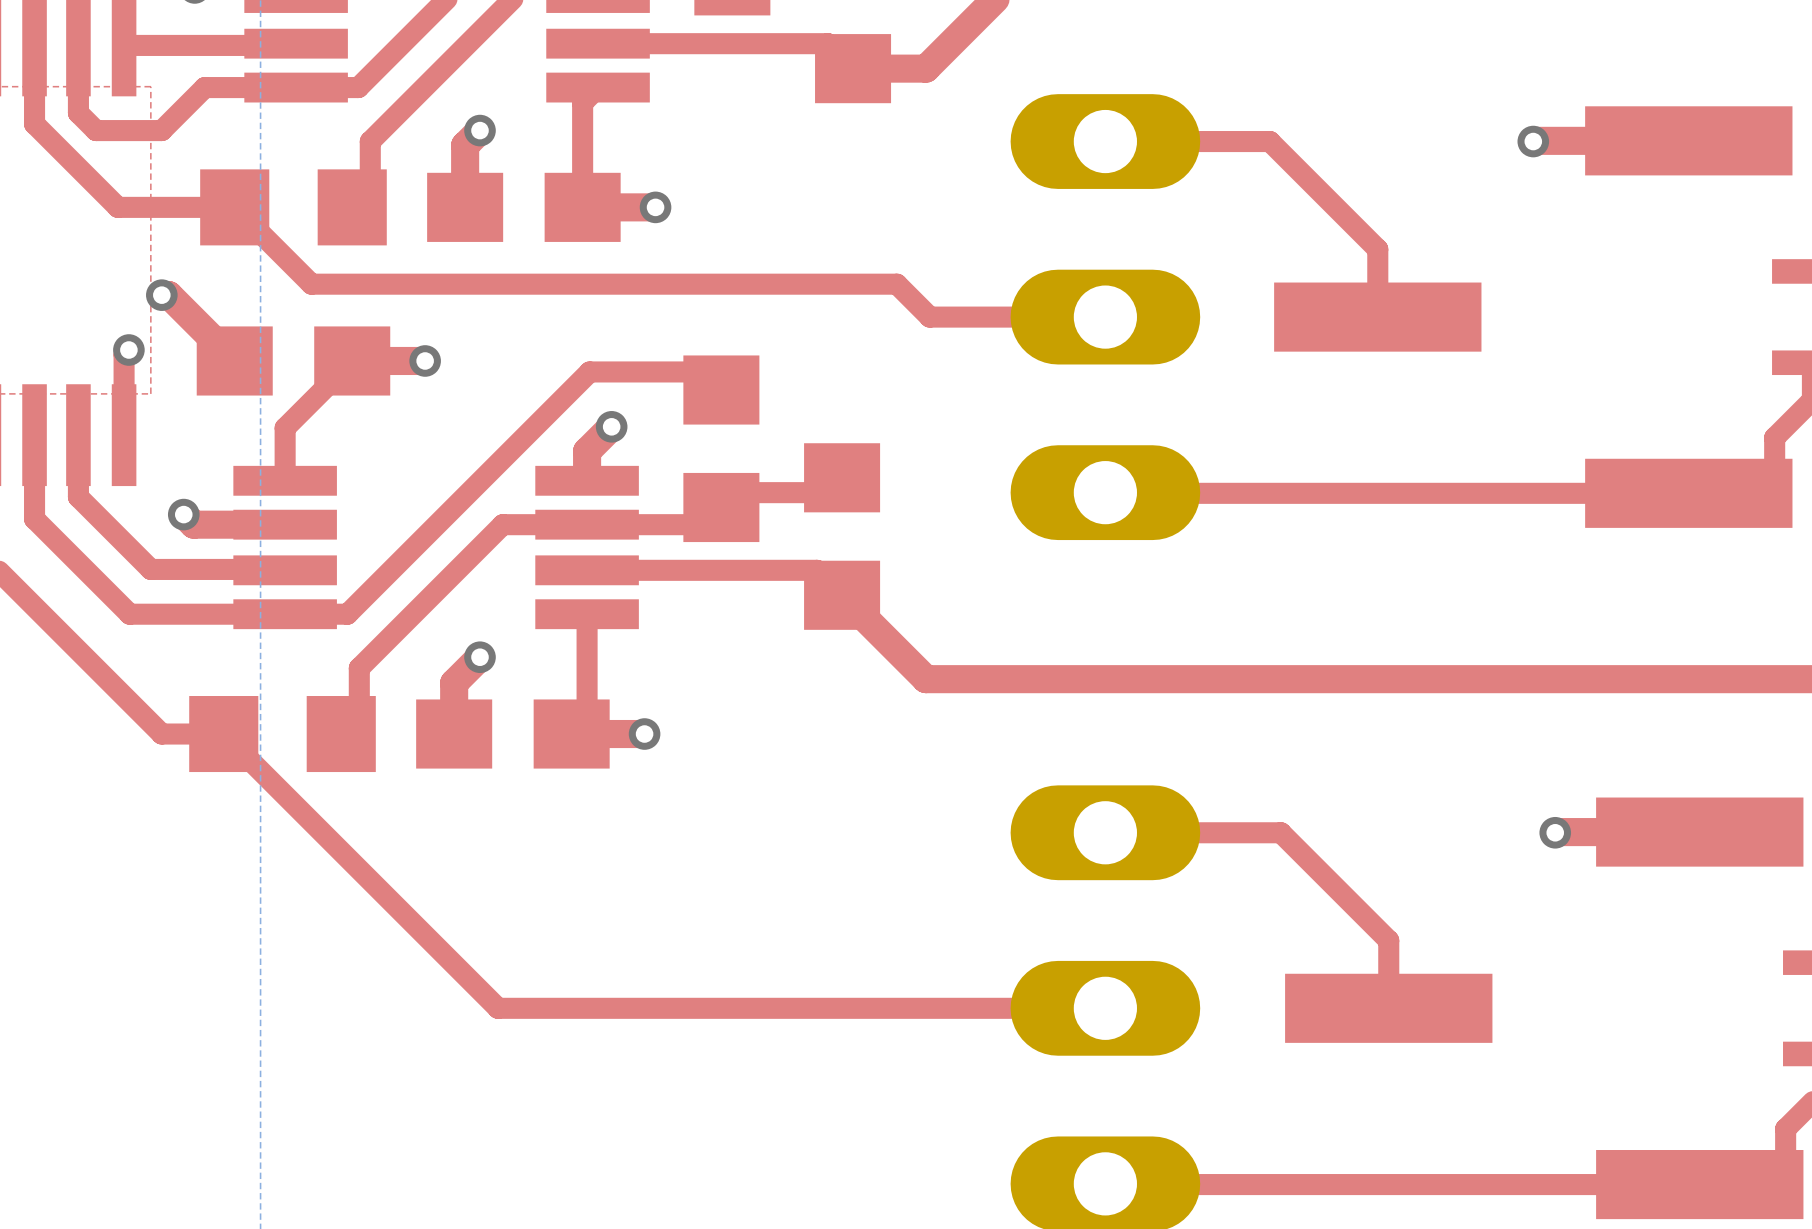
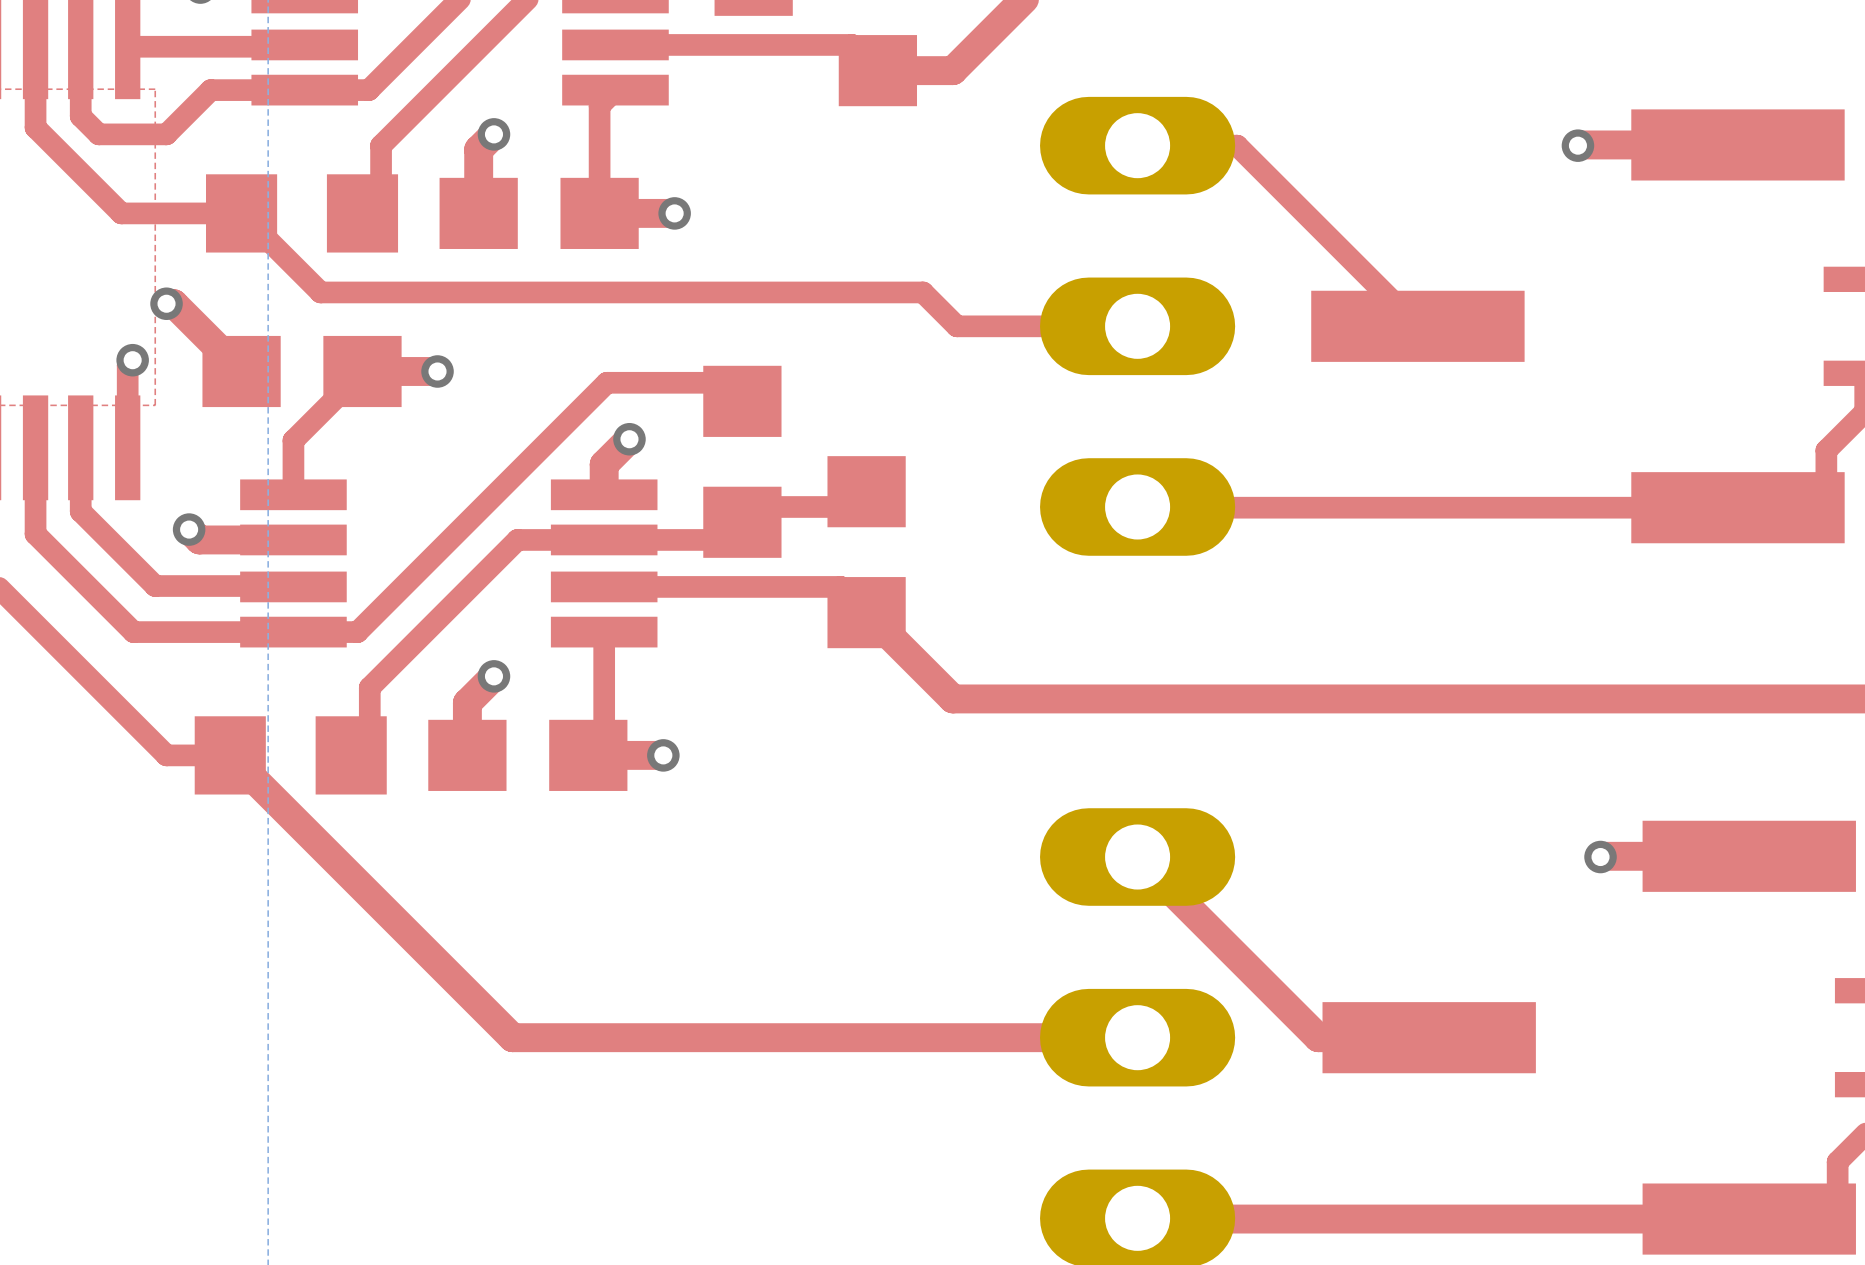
top track: (1202, 141) (1269, 141) (1377, 249) (1377, 317) -> (1237, 145) (1417, 326)
top track width: thin (223, 734) (498, 1008) (1105, 1008) -> thick (230, 755) (512, 1037) (1137, 1037)
top track: (1105, 832) (1280, 832) (1388, 940) (1388, 1008) -> (1137, 857) (1318, 1037) (1429, 1037)
top track width: thin (1699, 1184) (1106, 1184) -> thick (1749, 1219) (1138, 1219)

